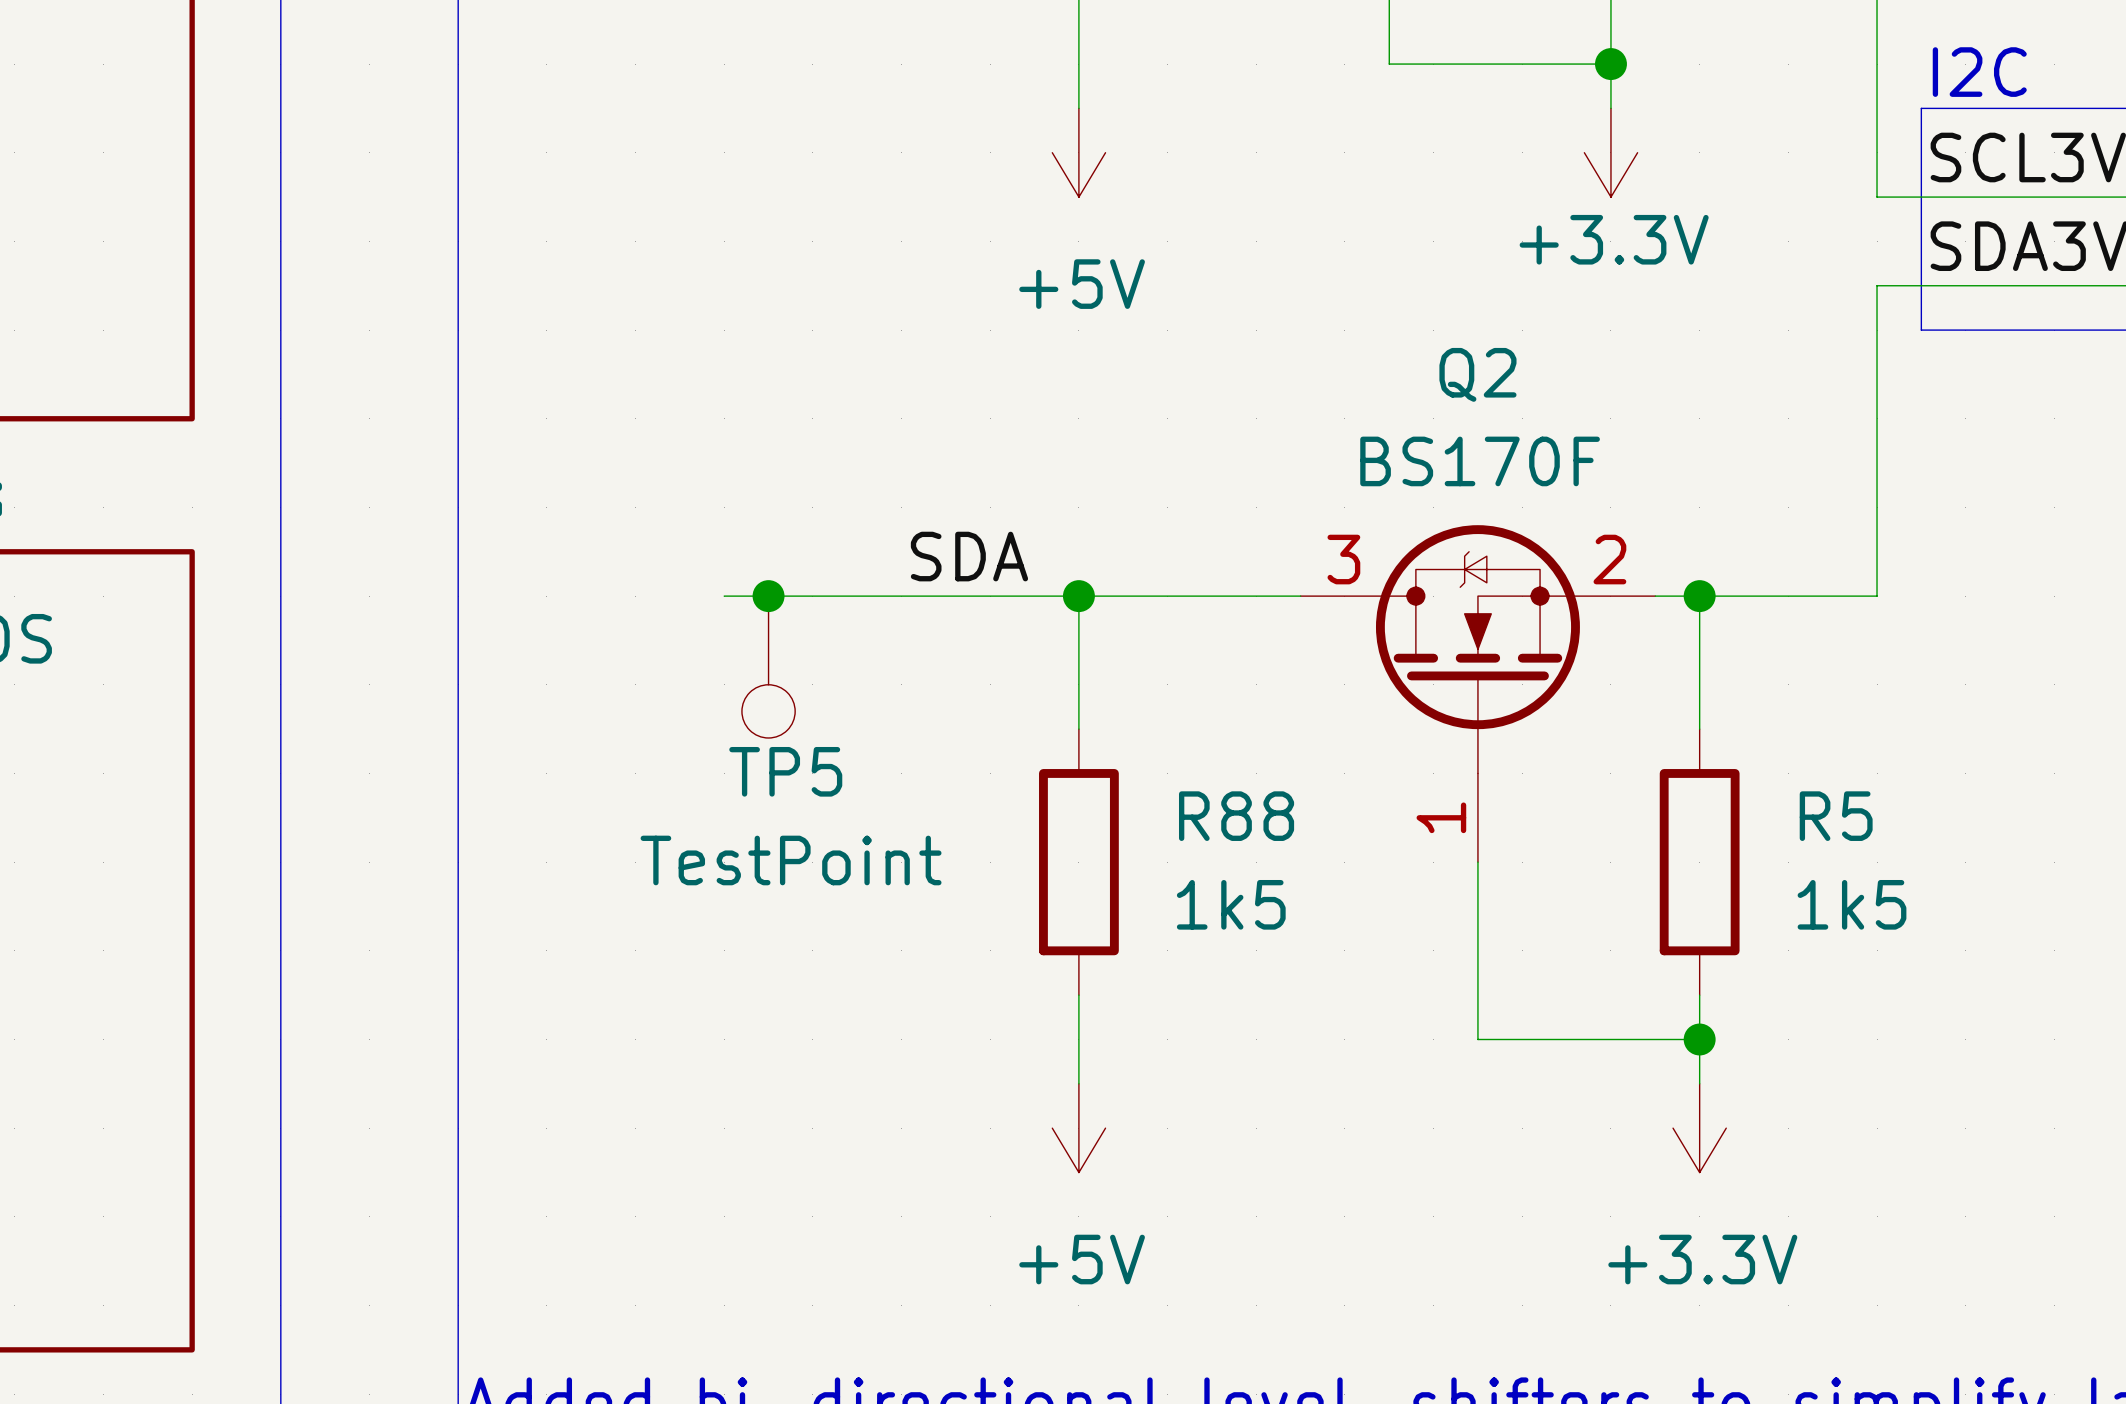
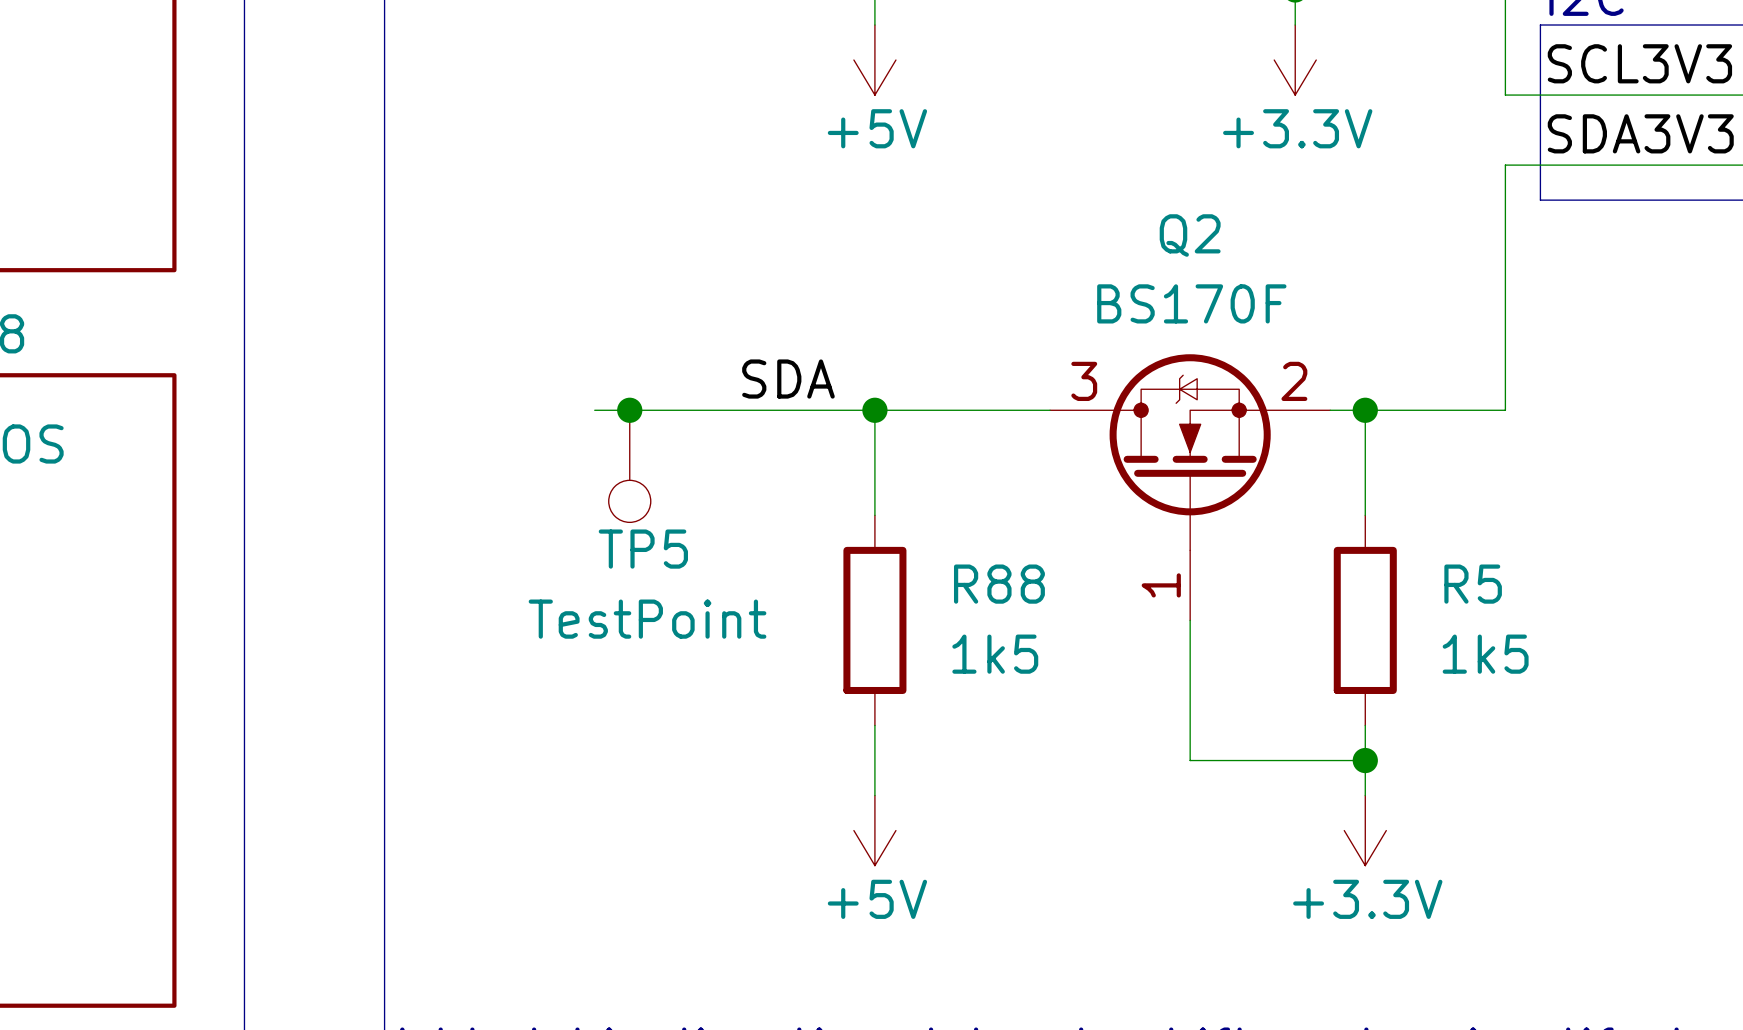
power symbol text position: +5V (1082, 284) -> +5V (877, 128)
power symbol text position: +5V (1082, 1259) -> +5V (877, 899)
power symbol text position: +3.3V (1702, 1259) -> +3.3V (1367, 899)

